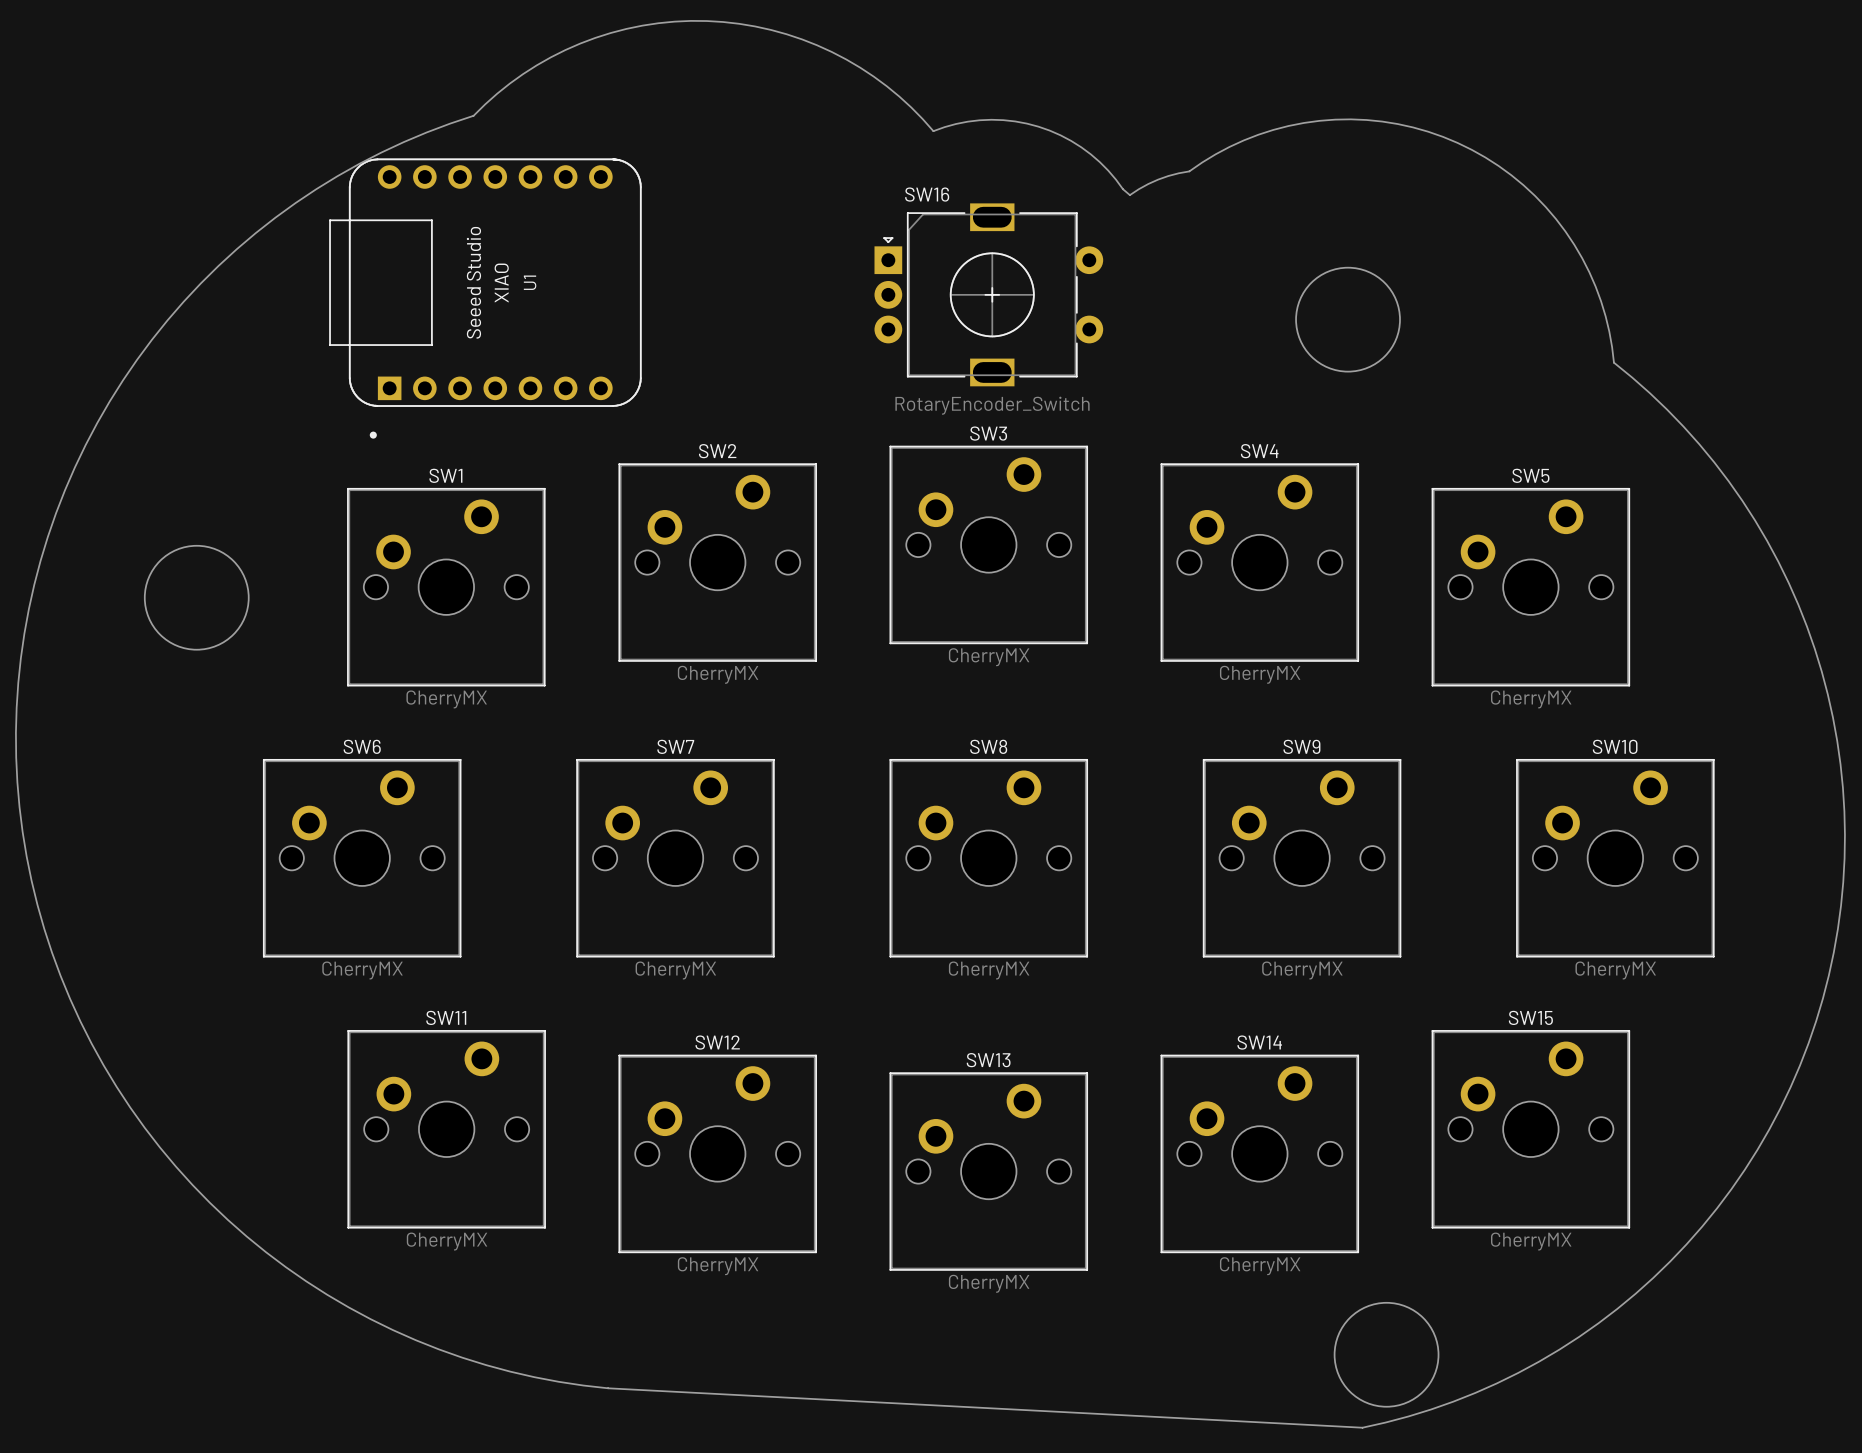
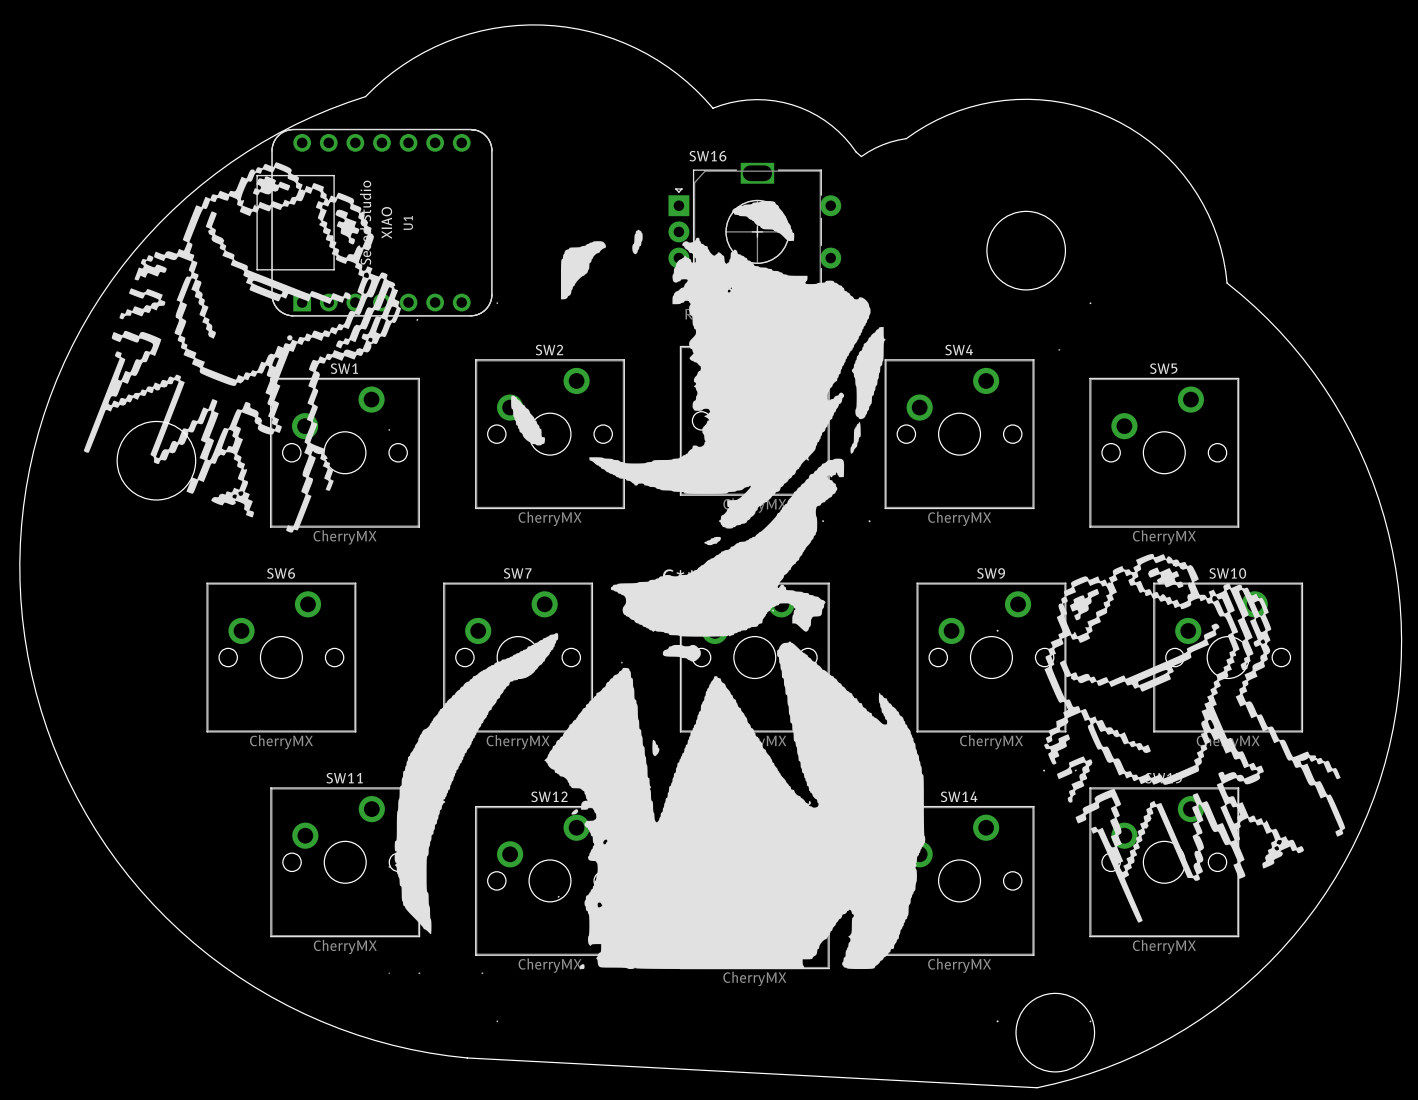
part: none -> (714, 592)

